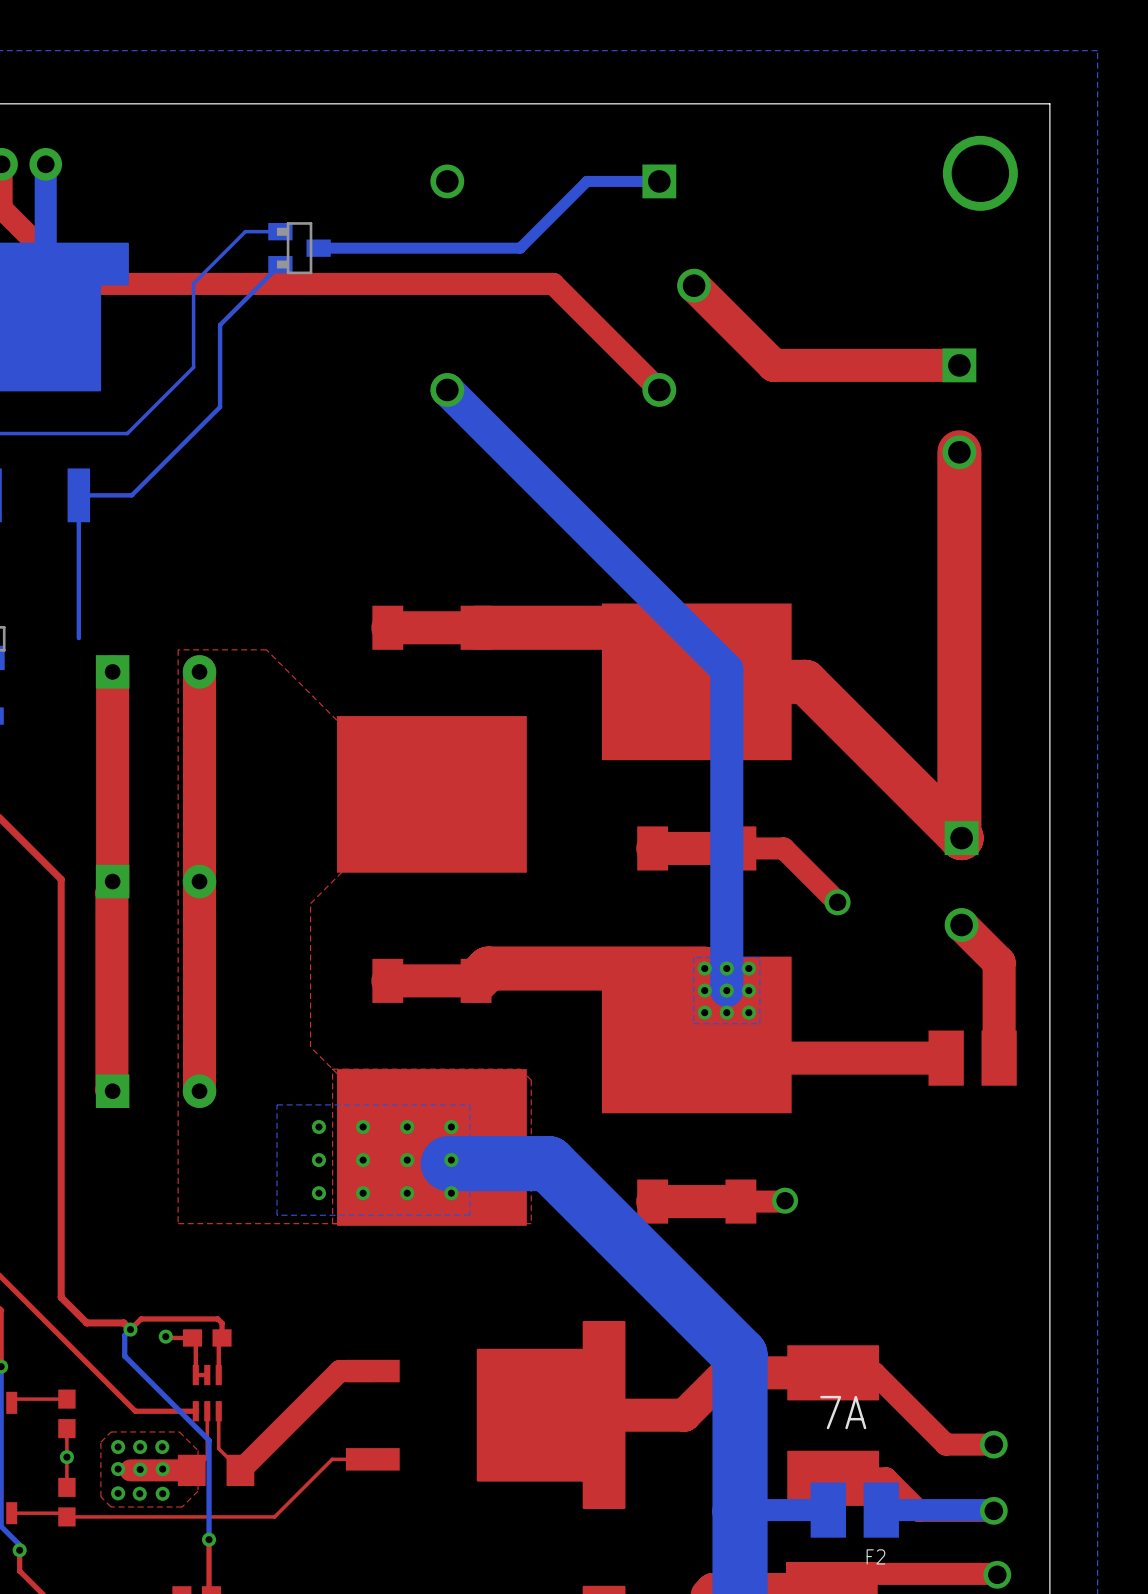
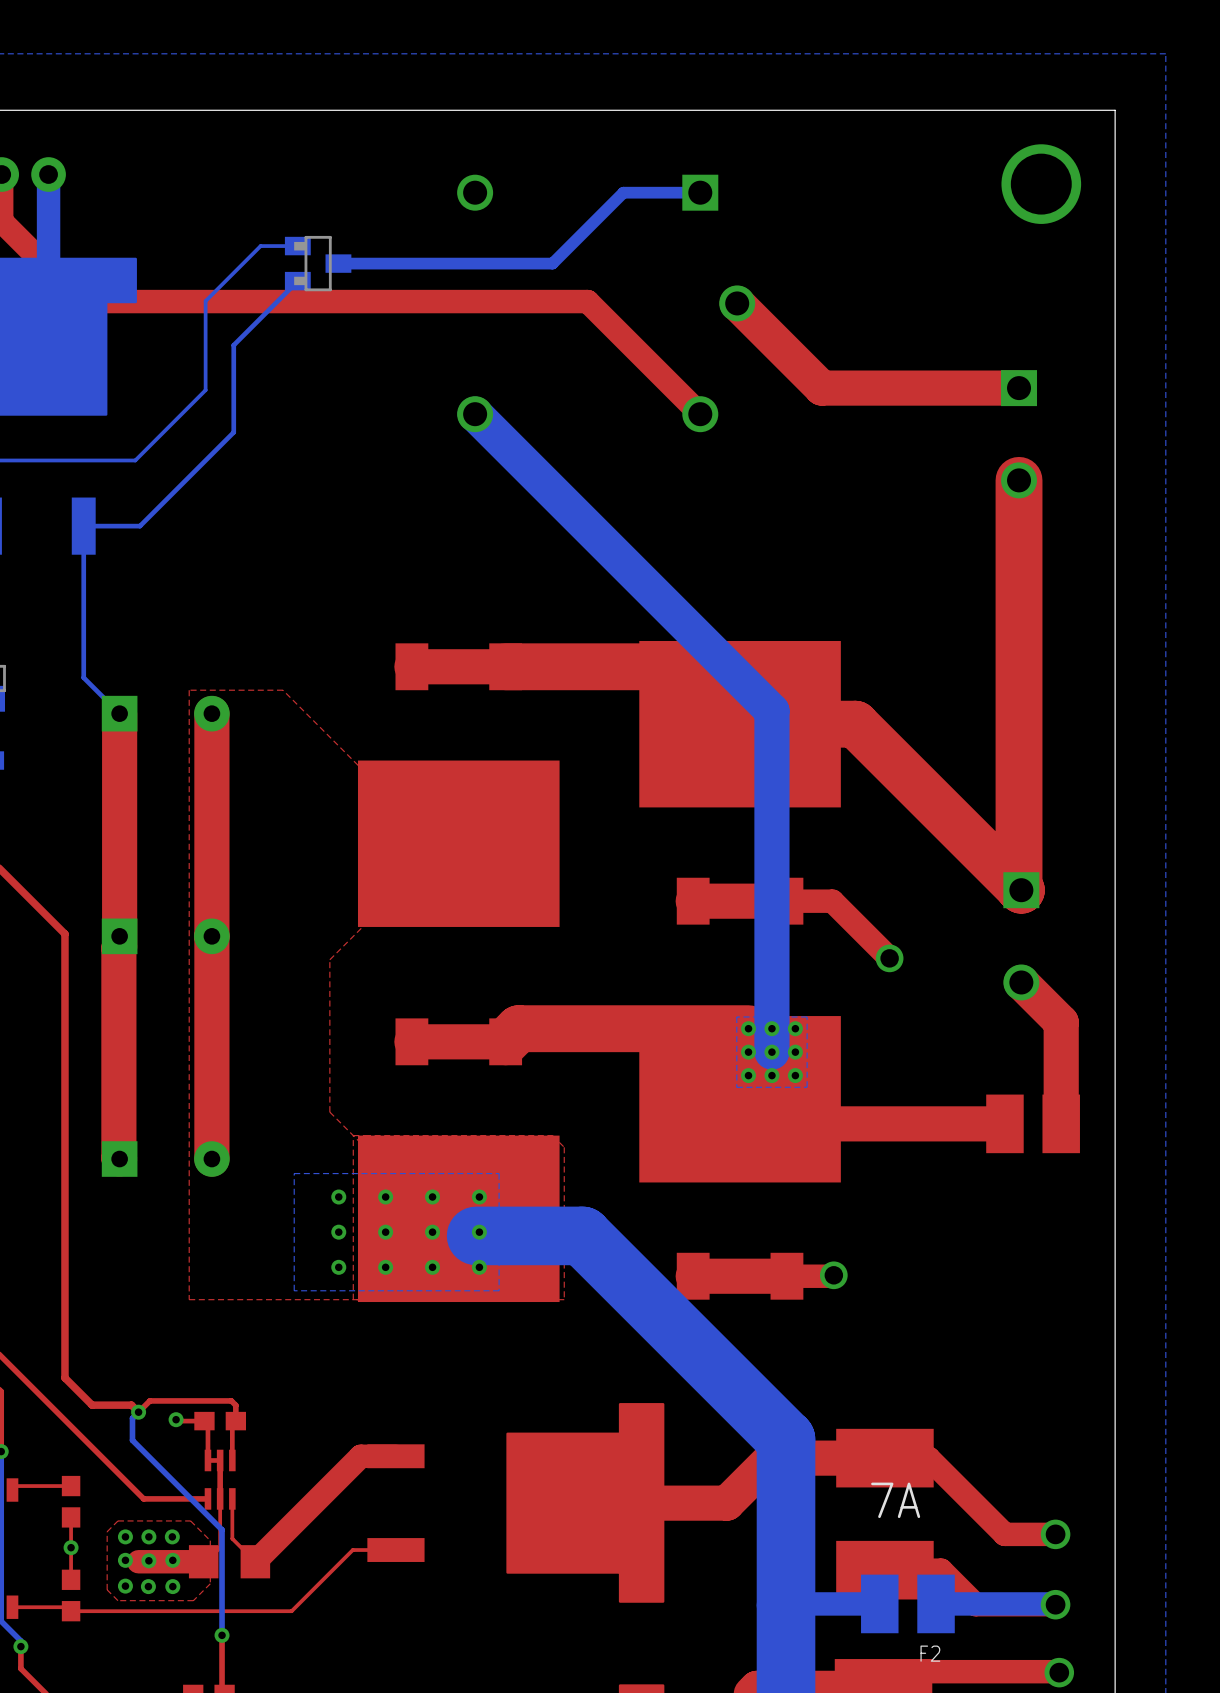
bottom track: none -> (83, 677) (119, 713)
top track: none -> (220, 1460) (220, 1498)

